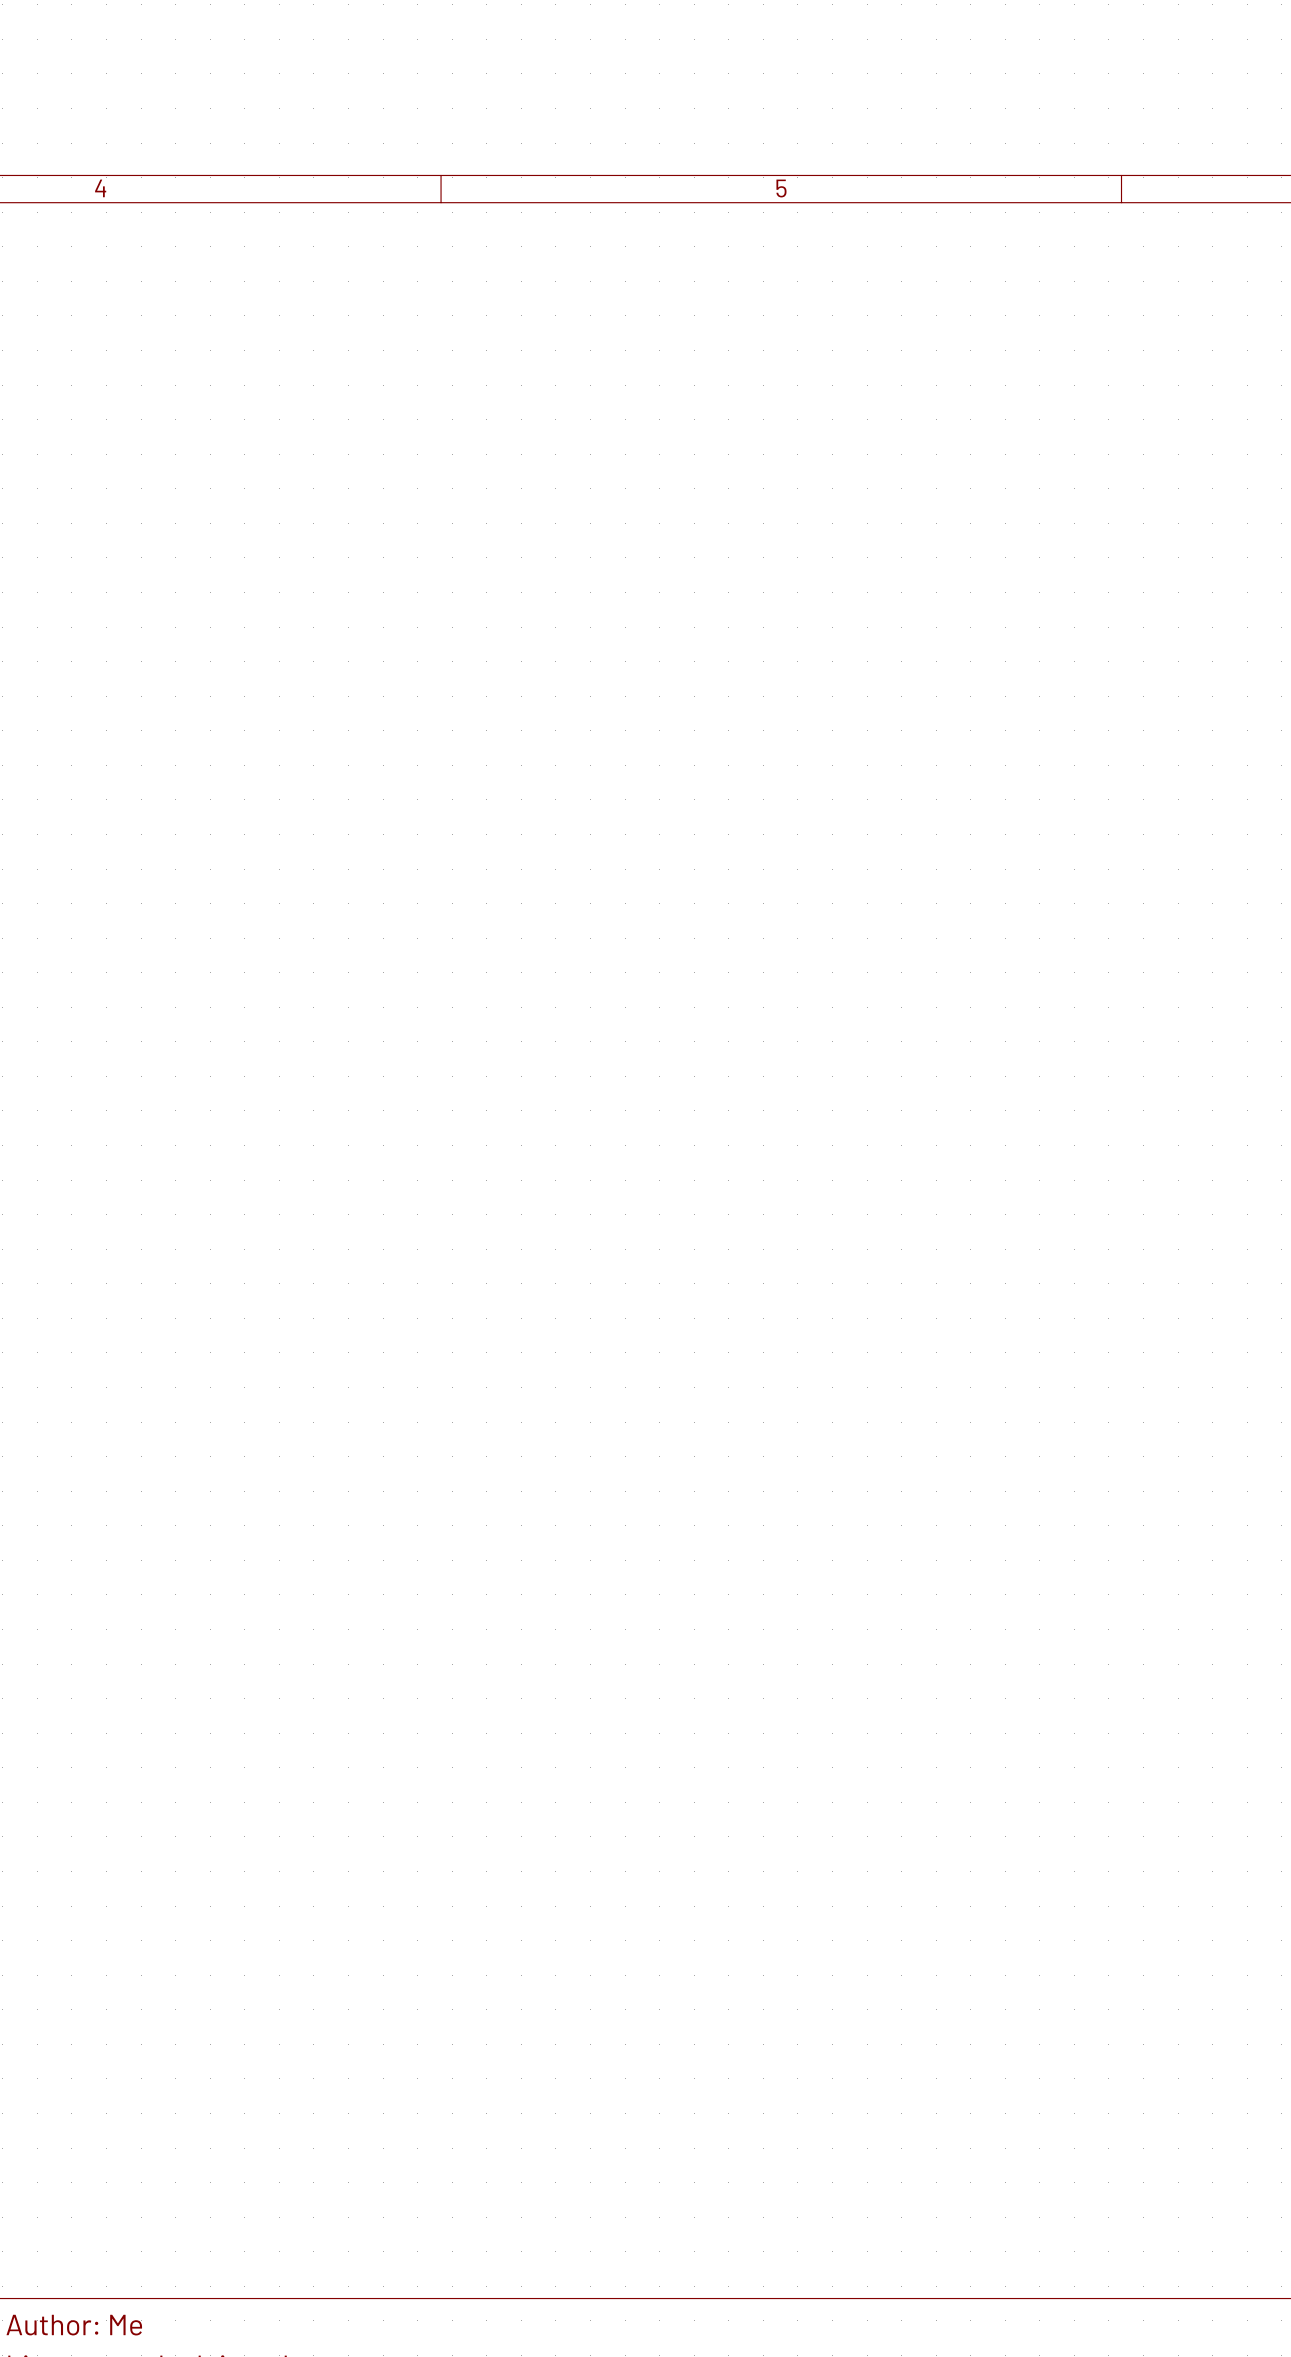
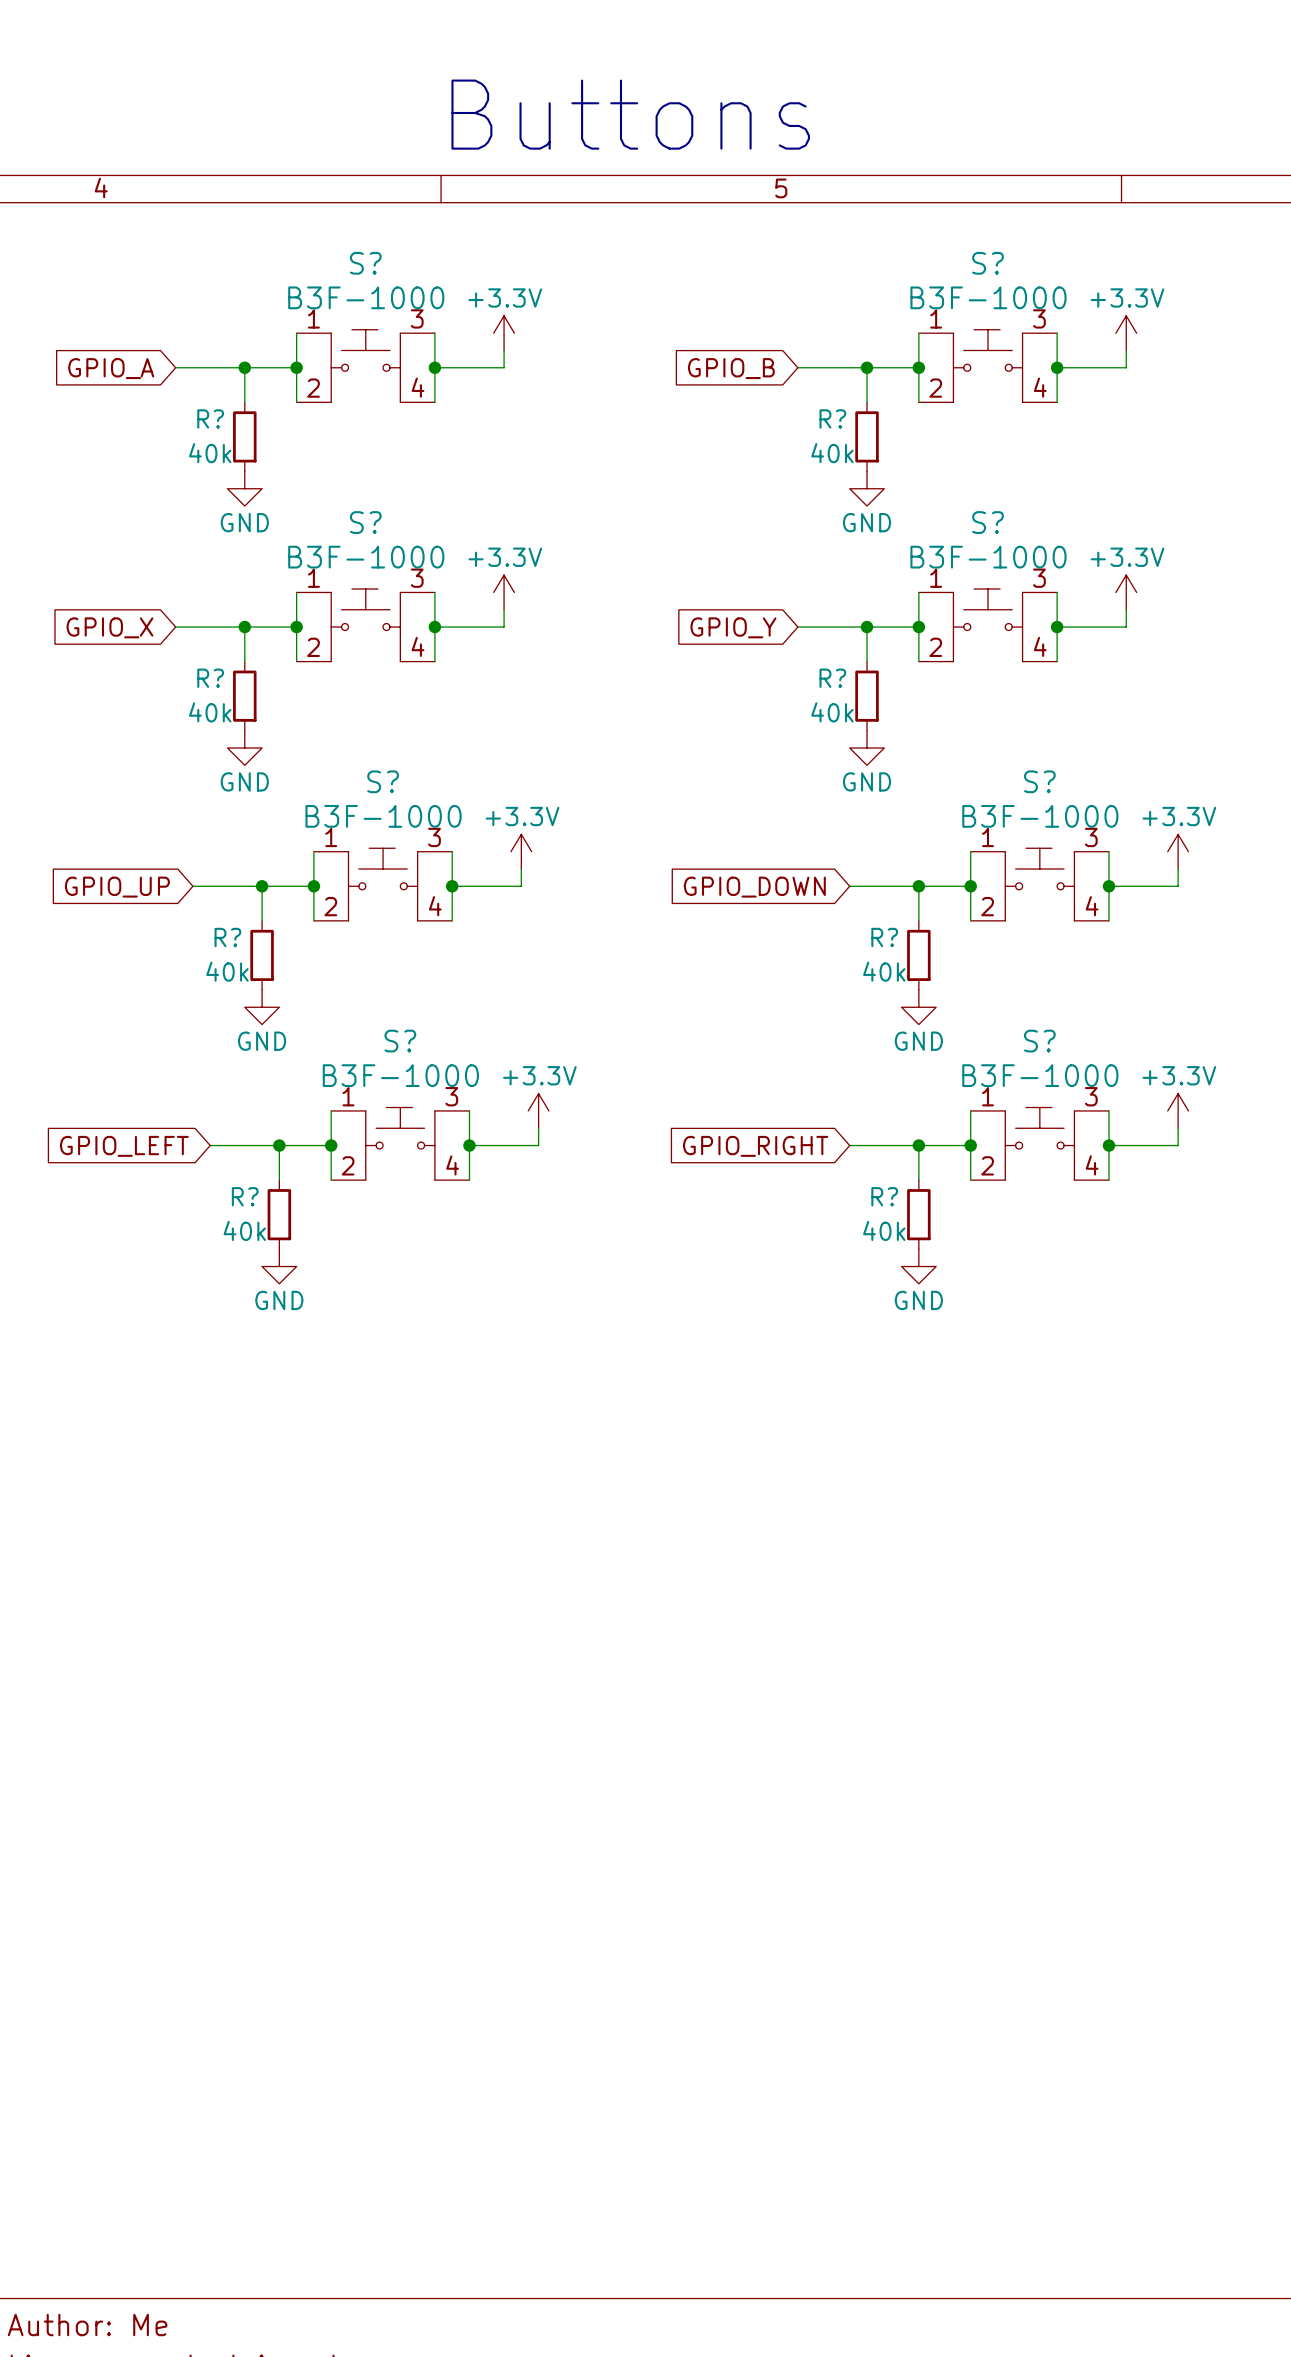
text: none -> Buttons (630, 114)
wire: none -> (296, 333) (296, 402)
wire: none -> (434, 333) (434, 402)
power symbol: none -> +3.3V (504, 333)
wire: none -> (918, 333) (918, 402)
wire: none -> (1057, 333) (1057, 402)
power symbol: none -> +3.3V (1126, 333)
wire: none -> (504, 350) (504, 367) (434, 367)
wire: none -> (1126, 350) (1126, 367) (1057, 367)
S?: none -> B3F-1000 (365, 366)
S?: none -> B3F-1000 (987, 366)
global label: none -> GPIO_A (111, 368)
wire: none -> (175, 367) (296, 367)
wire: none -> (244, 367) (244, 402)
junction: none -> (244, 367)
junction: none -> (296, 367)
junction: none -> (434, 367)
global label: none -> GPIO_B (731, 368)
wire: none -> (797, 367) (918, 367)
wire: none -> (867, 367) (867, 402)
junction: none -> (867, 367)
junction: none -> (918, 367)
junction: none -> (1057, 367)
R?: none -> 40k (244, 436)
R?: none -> 40k (867, 436)
power symbol: none -> GND (244, 488)
power symbol: none -> GND (867, 488)
wire: none -> (296, 592) (296, 661)
wire: none -> (434, 592) (434, 661)
power symbol: none -> +3.3V (504, 592)
wire: none -> (918, 592) (918, 661)
wire: none -> (1057, 592) (1057, 661)
power symbol: none -> +3.3V (1126, 592)
wire: none -> (504, 609) (504, 627) (434, 627)
wire: none -> (1126, 609) (1126, 627) (1057, 627)
S?: none -> B3F-1000 (365, 625)
S?: none -> B3F-1000 (987, 625)
global label: none -> GPIO_X (109, 627)
wire: none -> (175, 627) (296, 627)
wire: none -> (244, 627) (244, 661)
junction: none -> (244, 627)
junction: none -> (296, 627)
junction: none -> (434, 627)
global label: none -> GPIO_Y (733, 627)
wire: none -> (797, 627) (918, 627)
wire: none -> (867, 627) (867, 661)
junction: none -> (867, 627)
junction: none -> (918, 627)
junction: none -> (1057, 627)
R?: none -> 40k (244, 696)
R?: none -> 40k (867, 696)
power symbol: none -> GND (244, 748)
power symbol: none -> GND (867, 748)
wire: none -> (313, 851) (313, 920)
wire: none -> (452, 851) (452, 920)
power symbol: none -> +3.3V (521, 851)
wire: none -> (970, 851) (970, 920)
wire: none -> (1108, 851) (1108, 920)
power symbol: none -> +3.3V (1178, 851)
wire: none -> (521, 869) (521, 886) (452, 886)
wire: none -> (1178, 869) (1178, 886) (1108, 886)
S?: none -> B3F-1000 (383, 884)
S?: none -> B3F-1000 (1039, 884)
global label: none -> GPIO_UP (117, 887)
wire: none -> (192, 886) (313, 886)
wire: none -> (262, 886) (262, 920)
junction: none -> (262, 886)
junction: none -> (313, 886)
junction: none -> (452, 886)
global label: none -> GPIO_DOWN (754, 887)
wire: none -> (849, 886) (970, 886)
wire: none -> (918, 886) (918, 920)
junction: none -> (918, 886)
junction: none -> (970, 886)
junction: none -> (1108, 886)
R?: none -> 40k (262, 955)
R?: none -> 40k (918, 955)
power symbol: none -> GND (262, 1007)
power symbol: none -> GND (918, 1007)
wire: none -> (331, 1110) (331, 1180)
wire: none -> (469, 1110) (469, 1180)
power symbol: none -> +3.3V (538, 1110)
wire: none -> (970, 1110) (970, 1180)
wire: none -> (1108, 1110) (1108, 1180)
power symbol: none -> +3.3V (1178, 1110)
wire: none -> (538, 1128) (538, 1145) (469, 1145)
wire: none -> (1178, 1128) (1178, 1145) (1108, 1145)
S?: none -> B3F-1000 (400, 1143)
S?: none -> B3F-1000 (1039, 1143)
global label: none -> GPIO_LEFT (124, 1146)
wire: none -> (210, 1145) (331, 1145)
wire: none -> (279, 1145) (279, 1180)
junction: none -> (279, 1145)
junction: none -> (331, 1145)
junction: none -> (469, 1145)
global label: none -> GPIO_RIGHT (755, 1146)
wire: none -> (849, 1145) (970, 1145)
wire: none -> (918, 1145) (918, 1180)
junction: none -> (918, 1145)
junction: none -> (970, 1145)
junction: none -> (1108, 1145)
R?: none -> 40k (279, 1214)
R?: none -> 40k (918, 1214)
power symbol: none -> GND (279, 1266)
power symbol: none -> GND (918, 1266)

